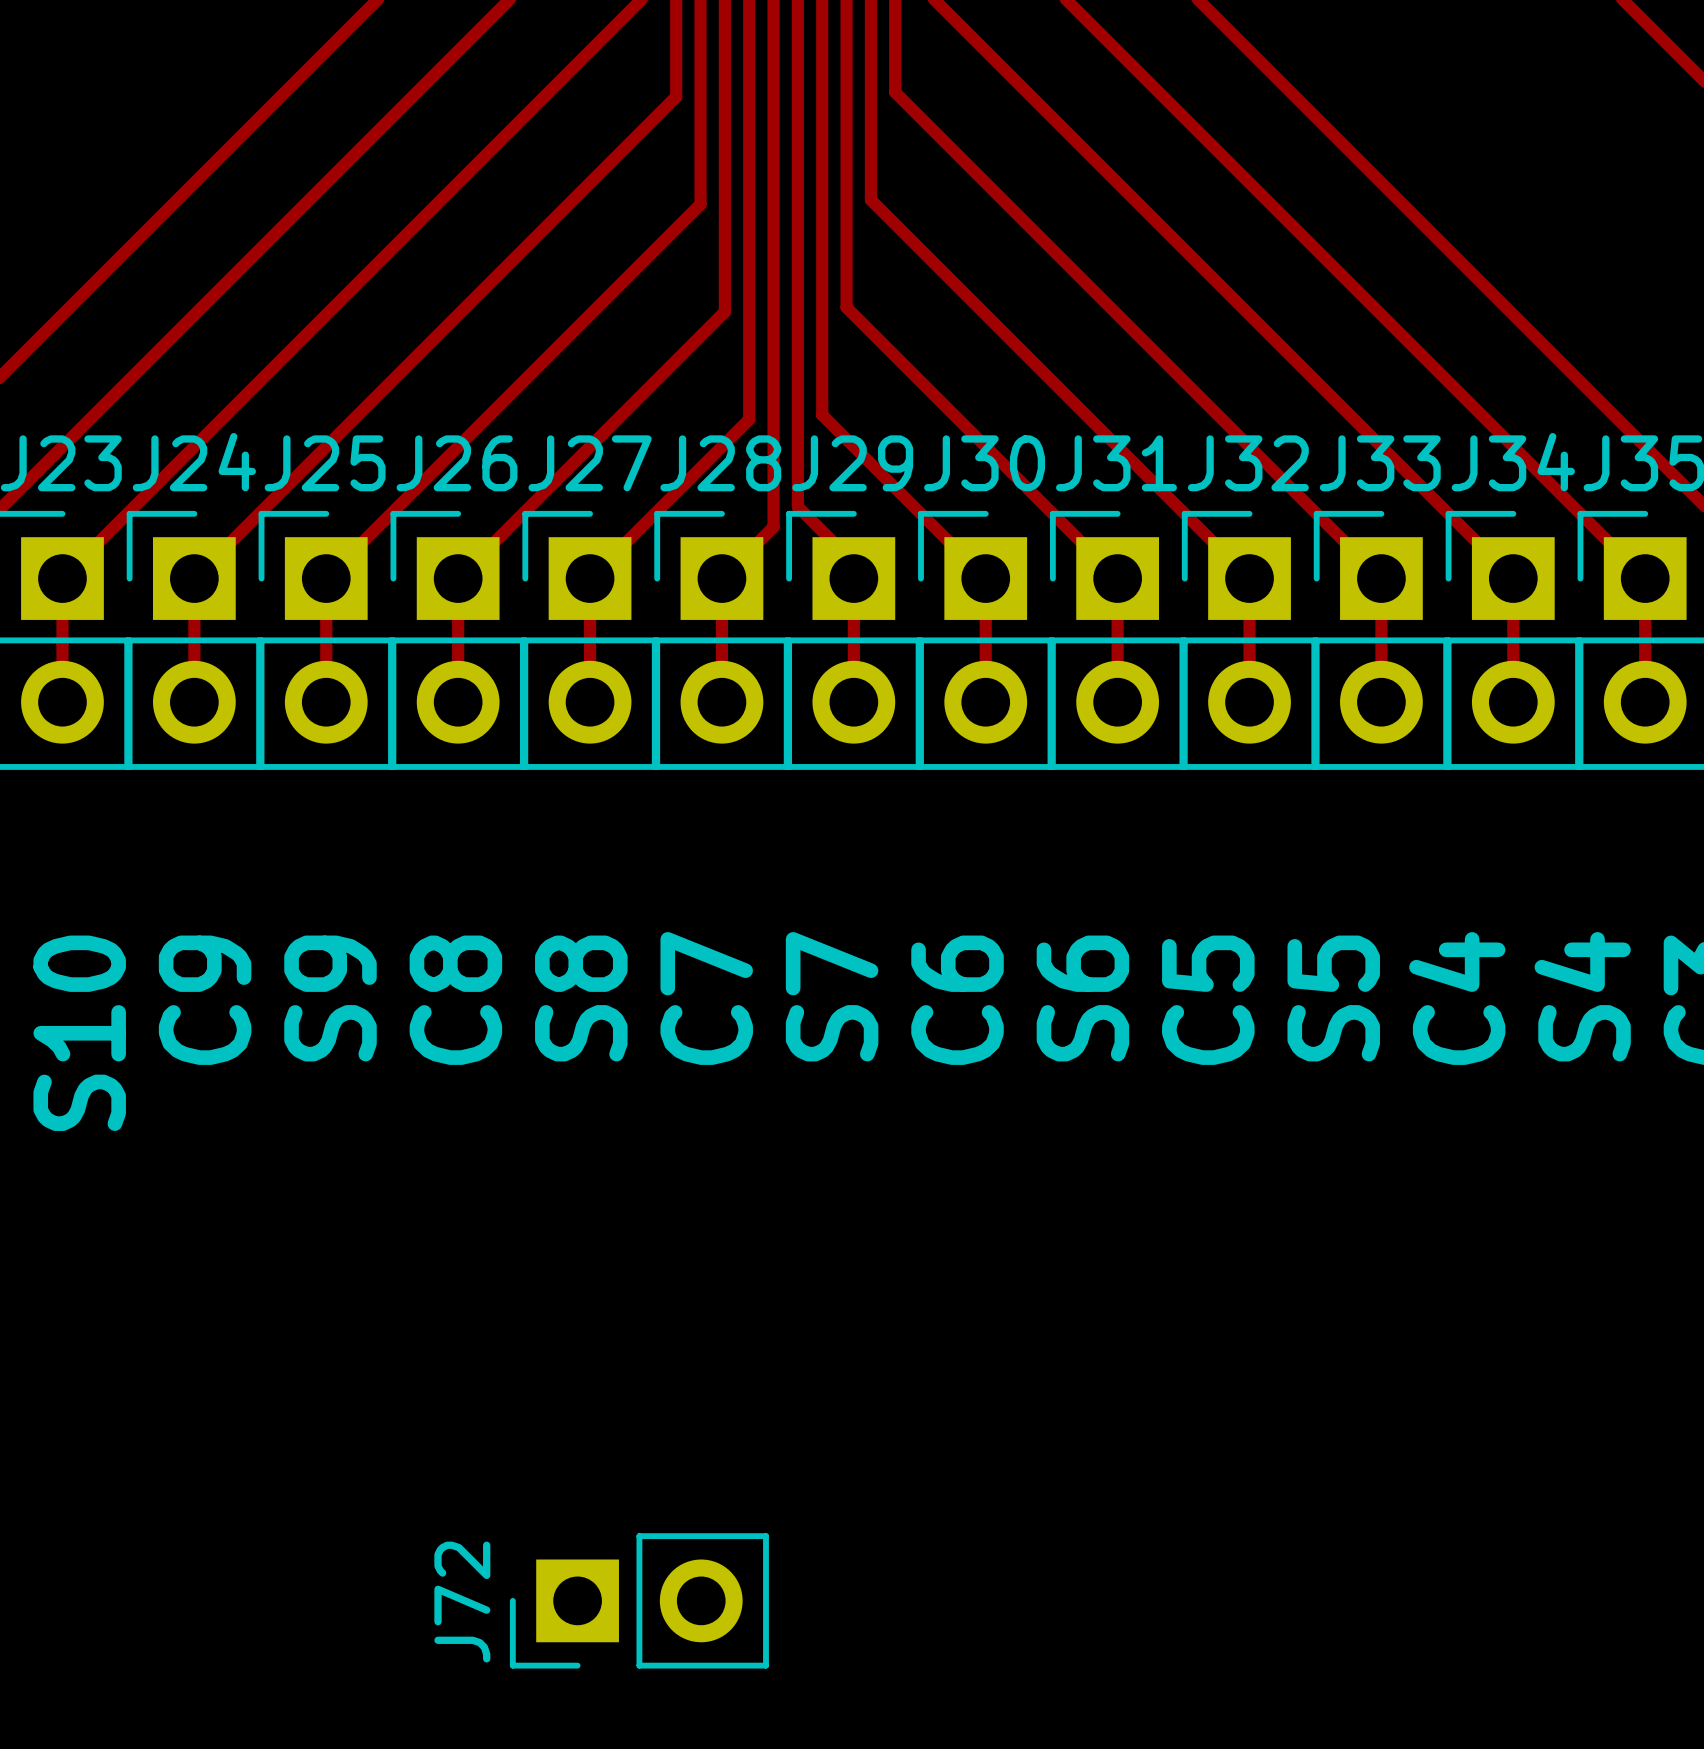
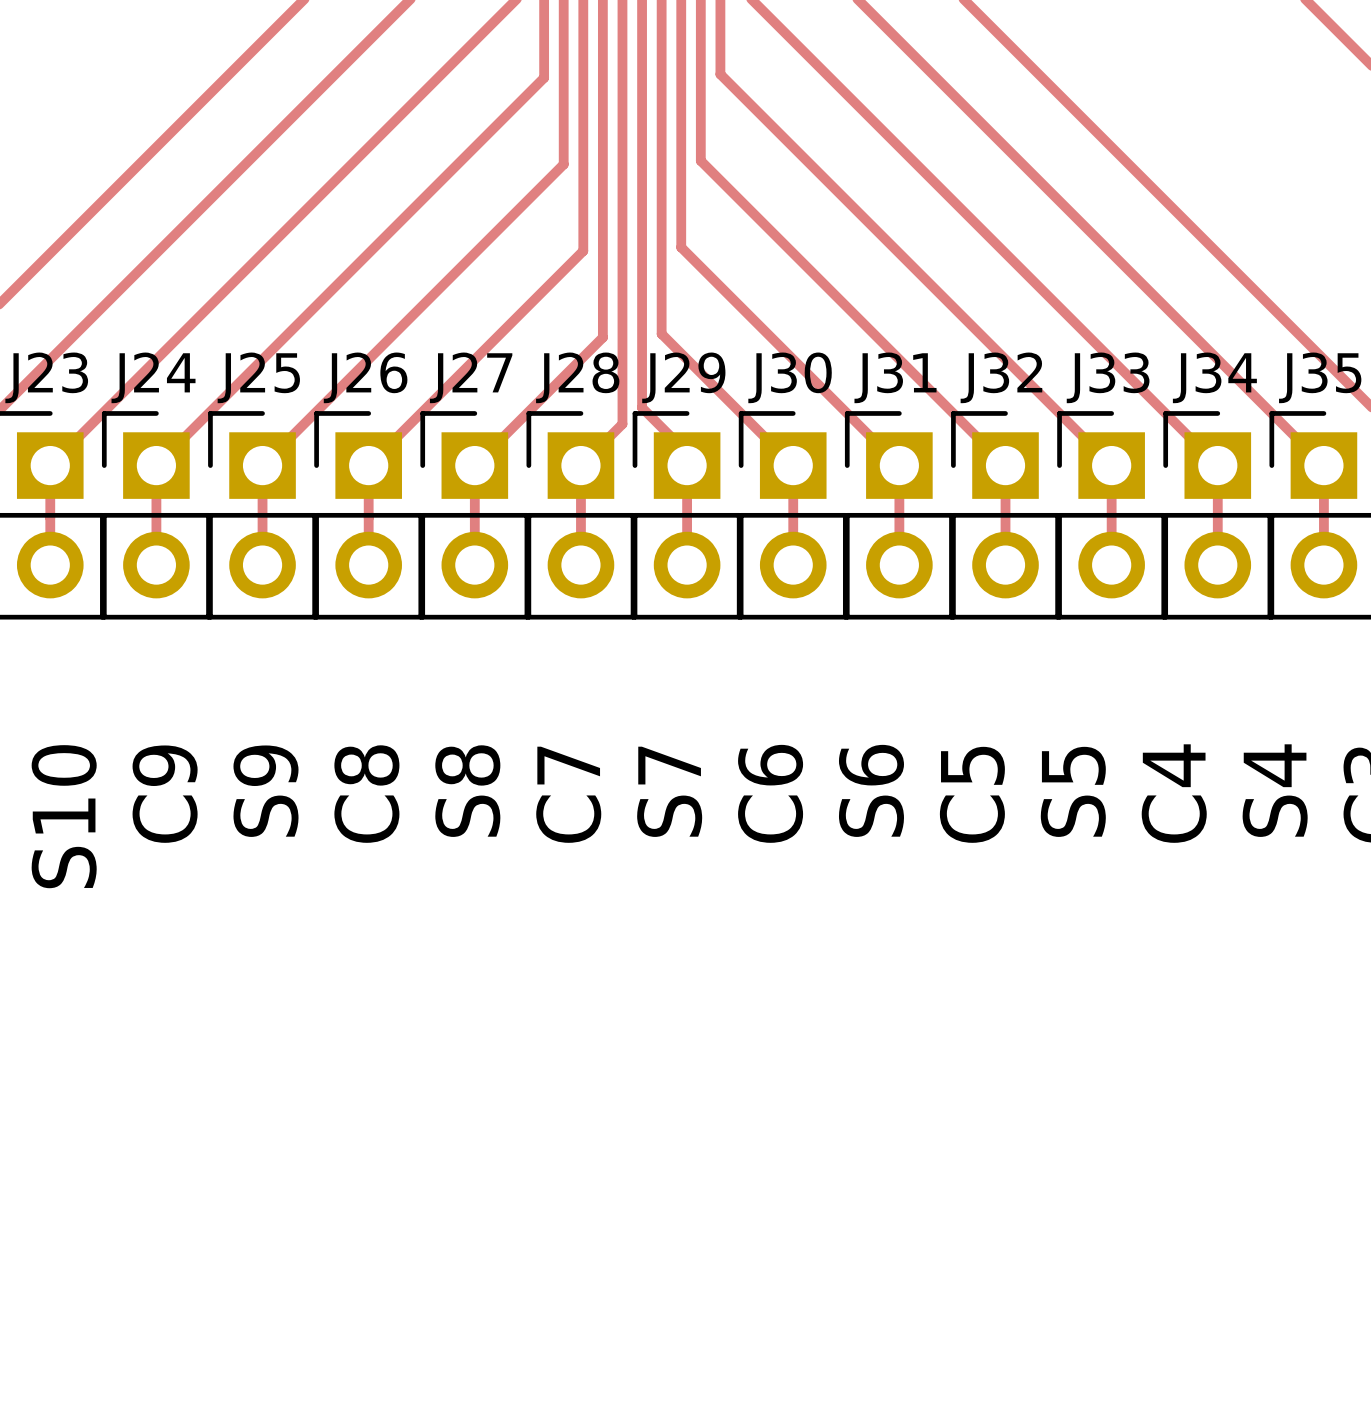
J72: (639, 1600) -> none

